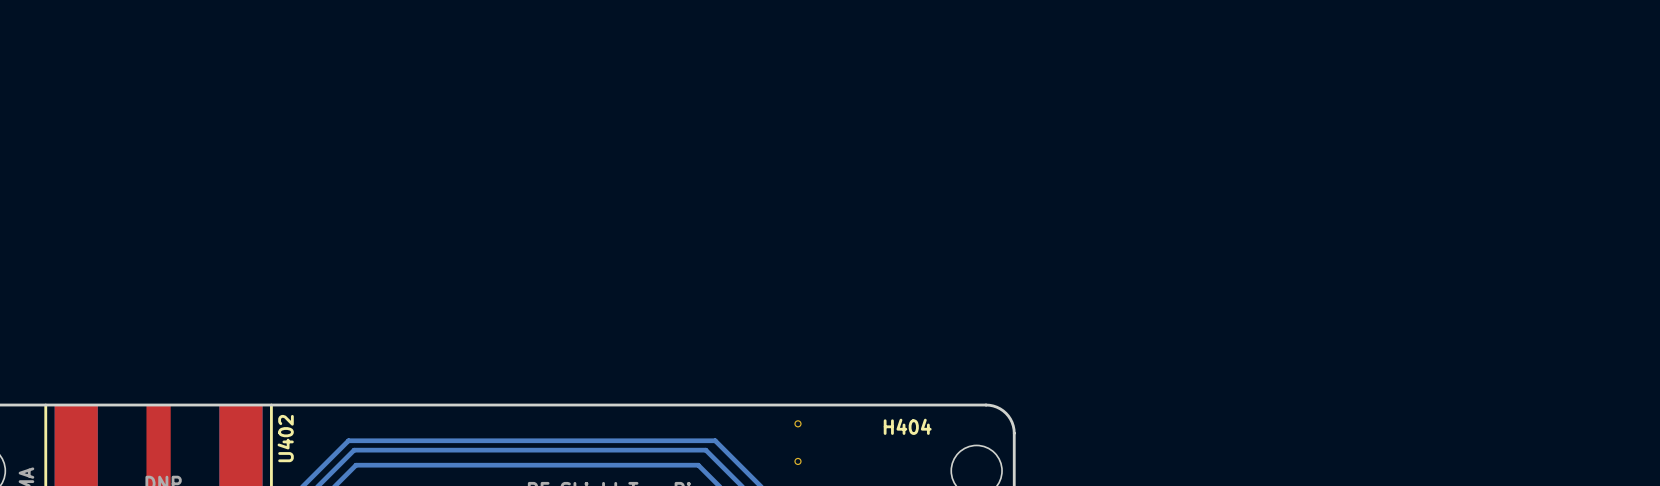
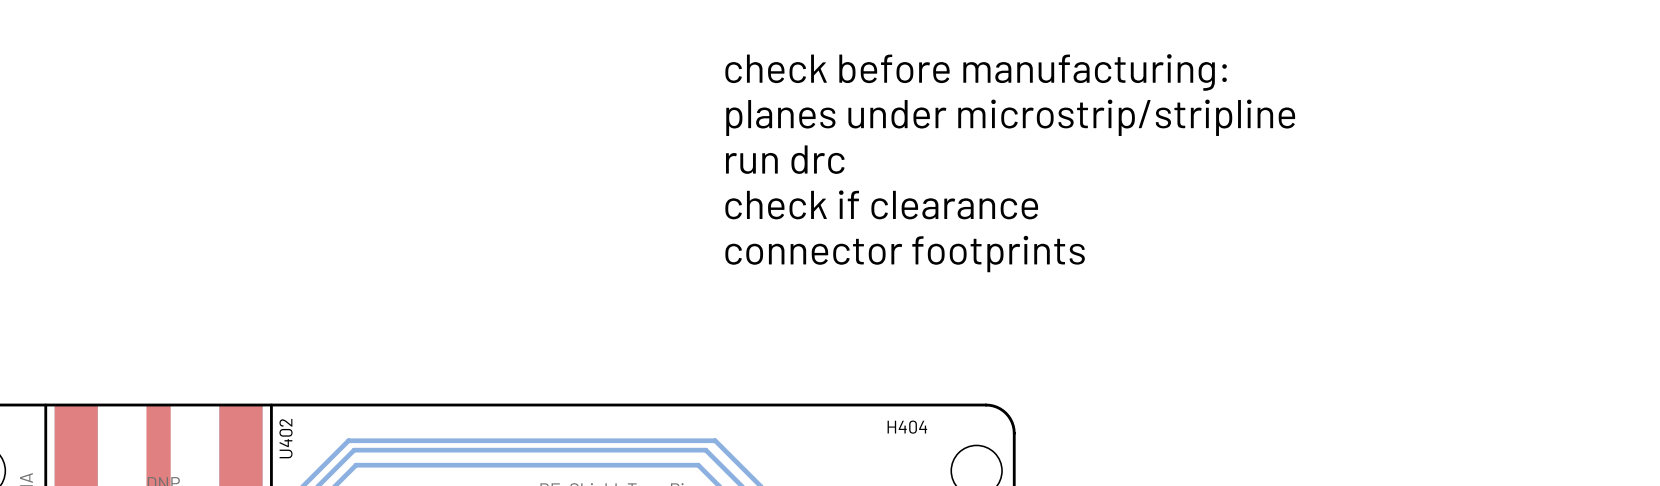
text: none -> check before manufacturing: (976, 72)
text: none -> planes under microstrip/stripline (1010, 117)
text: none -> run drc (785, 159)
text: none -> check if clearance (881, 204)
text: none -> connector footprints (905, 254)
part: (797, 423) -> none
part: (797, 461) -> none

